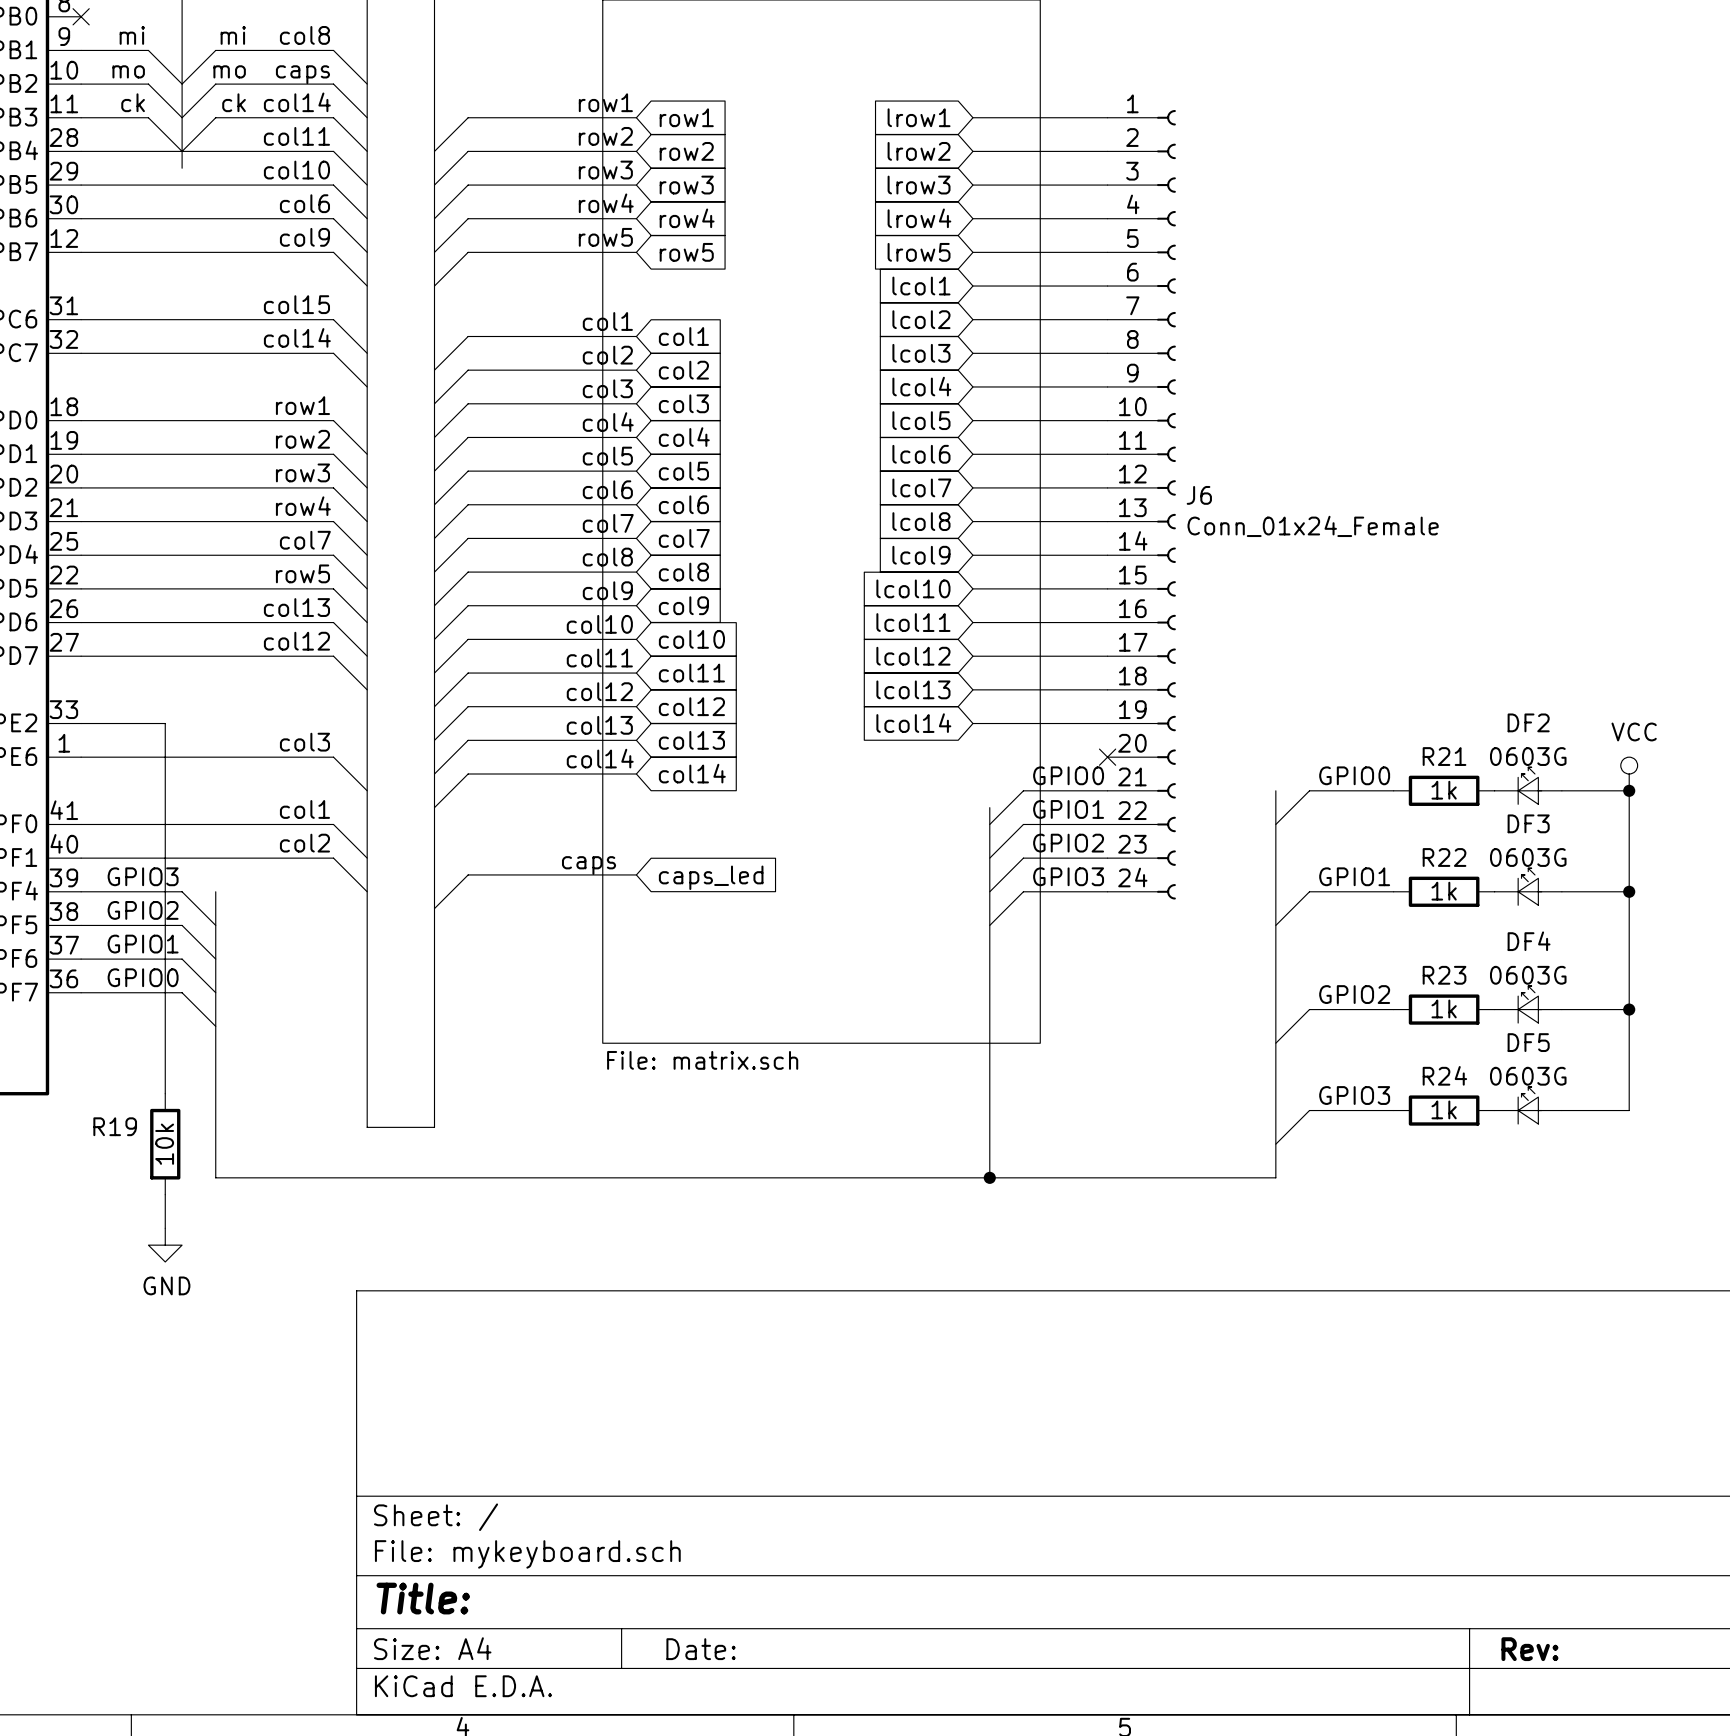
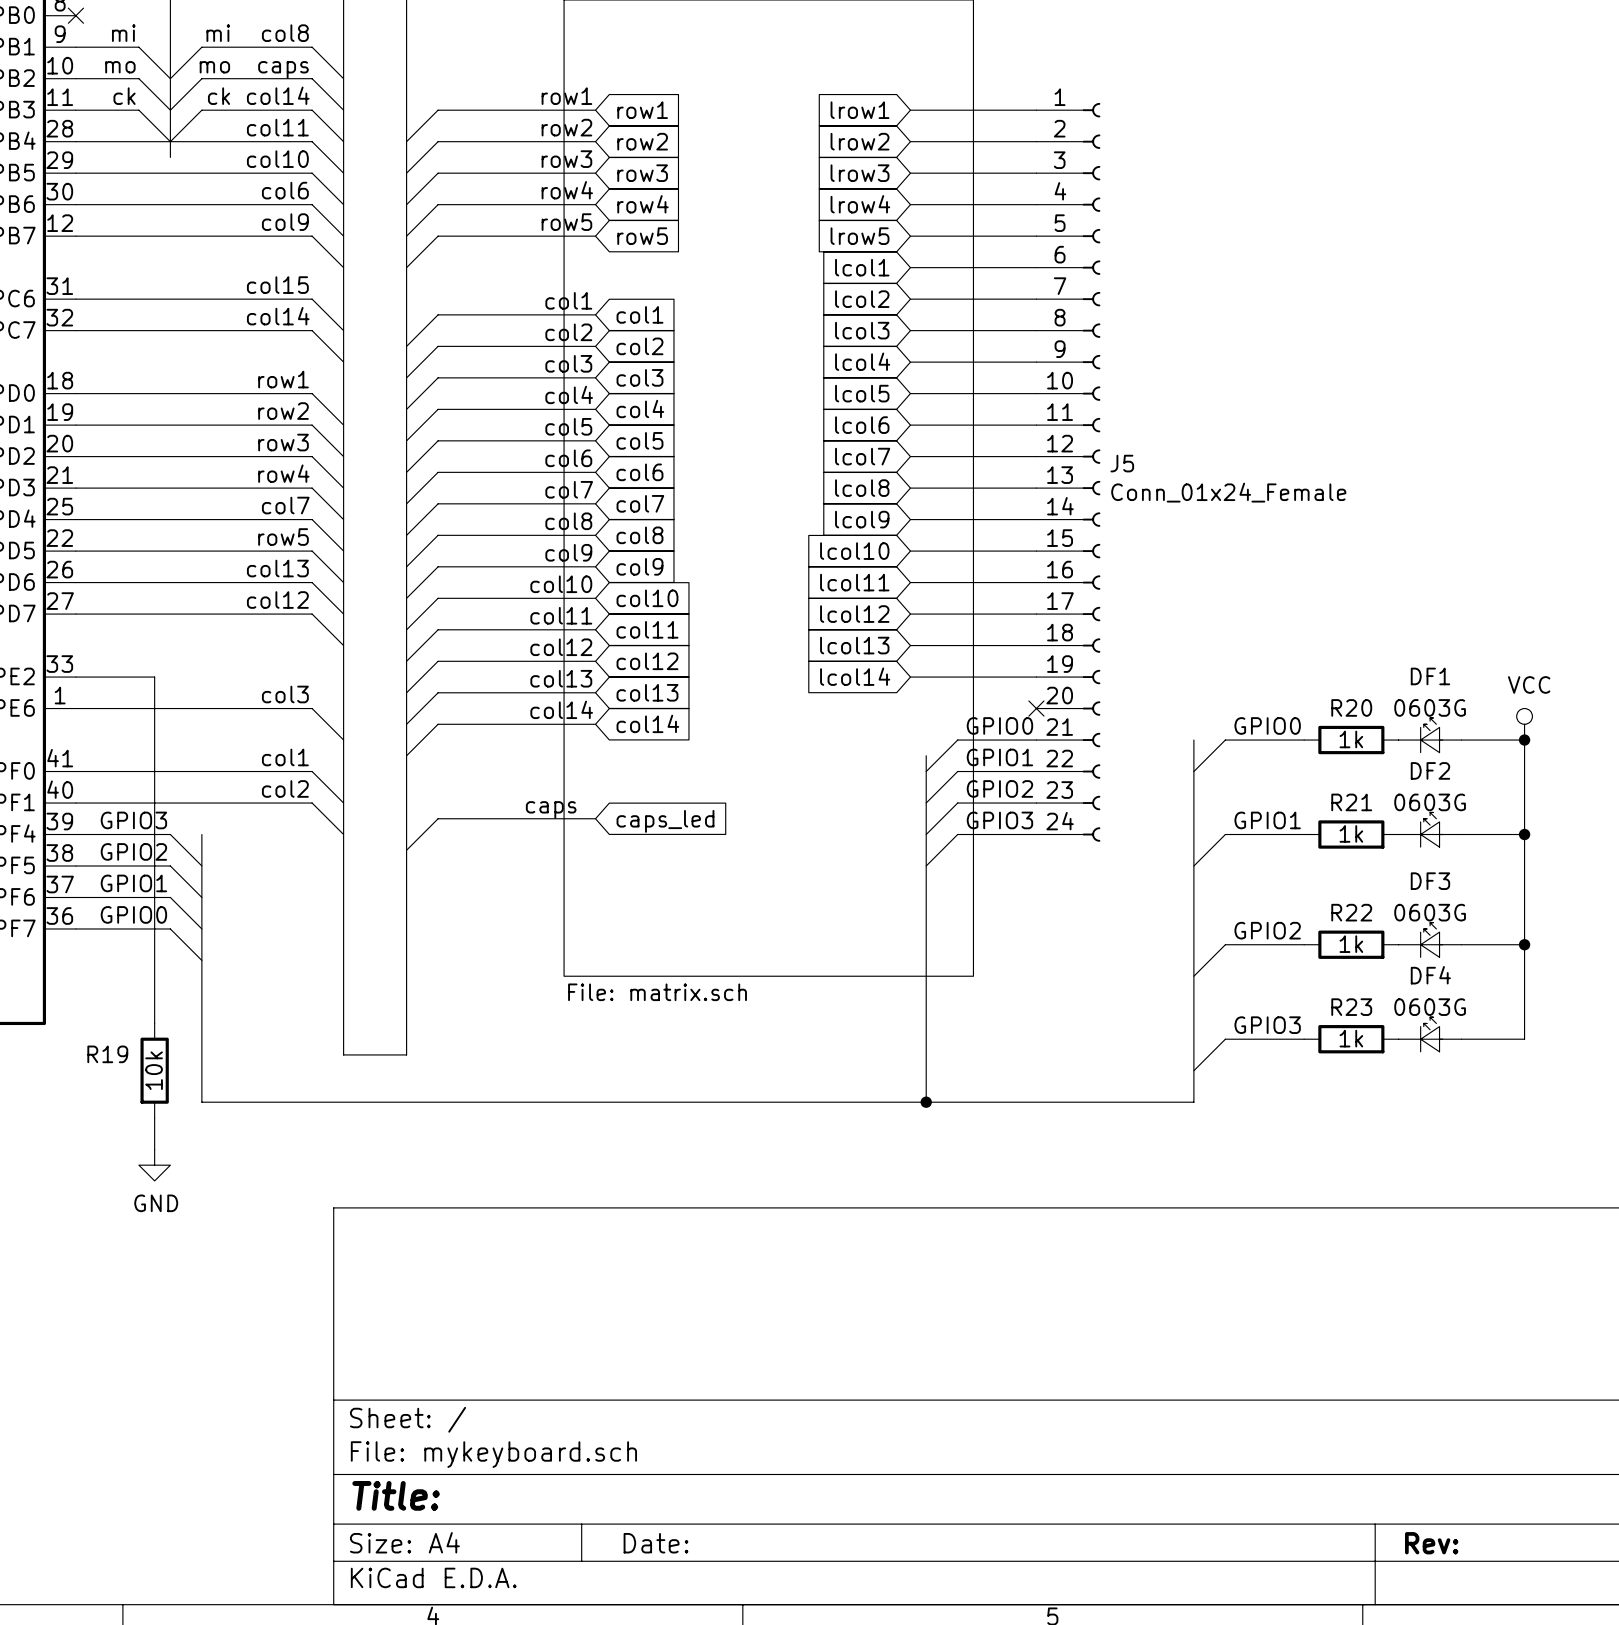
J6 name: J6 (1199, 495) -> J5 (1122, 463)
DF2 name: DF2 (1528, 722) -> DF1 (1430, 676)
R21 name: R21 (1444, 756) -> R20 (1351, 707)
DF3 name: DF3 (1528, 823) -> DF2 (1430, 770)
R22 name: R22 (1444, 857) -> R21 (1351, 802)
DF4 name: DF4 (1529, 941) -> DF3 (1430, 881)
R23 name: R23 (1444, 975) -> R22 (1351, 912)
DF5 name: DF5 (1528, 1042) -> DF4 (1430, 975)
R24 name: R24 (1444, 1075) -> R23 (1351, 1007)

